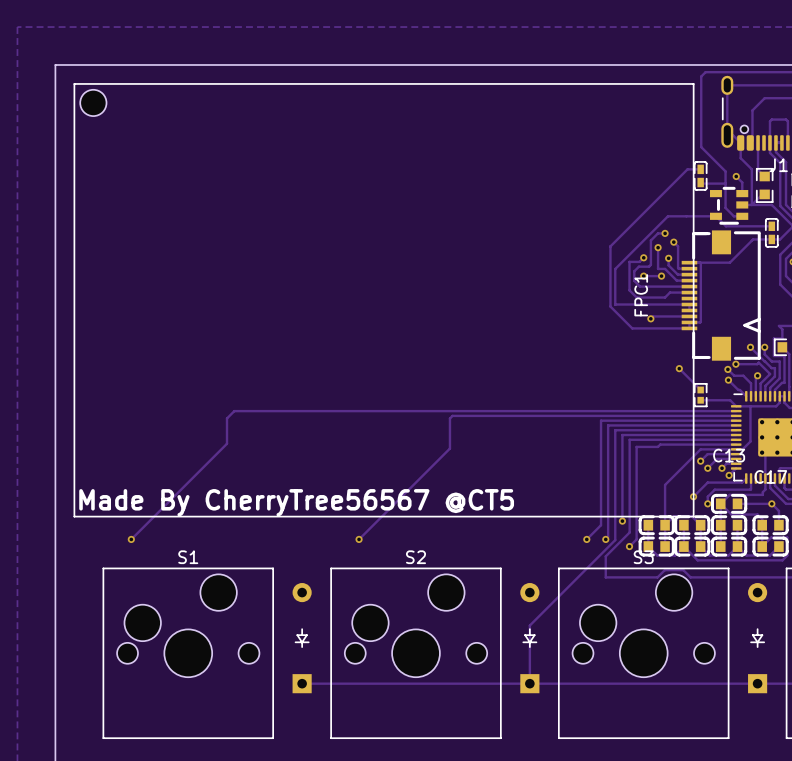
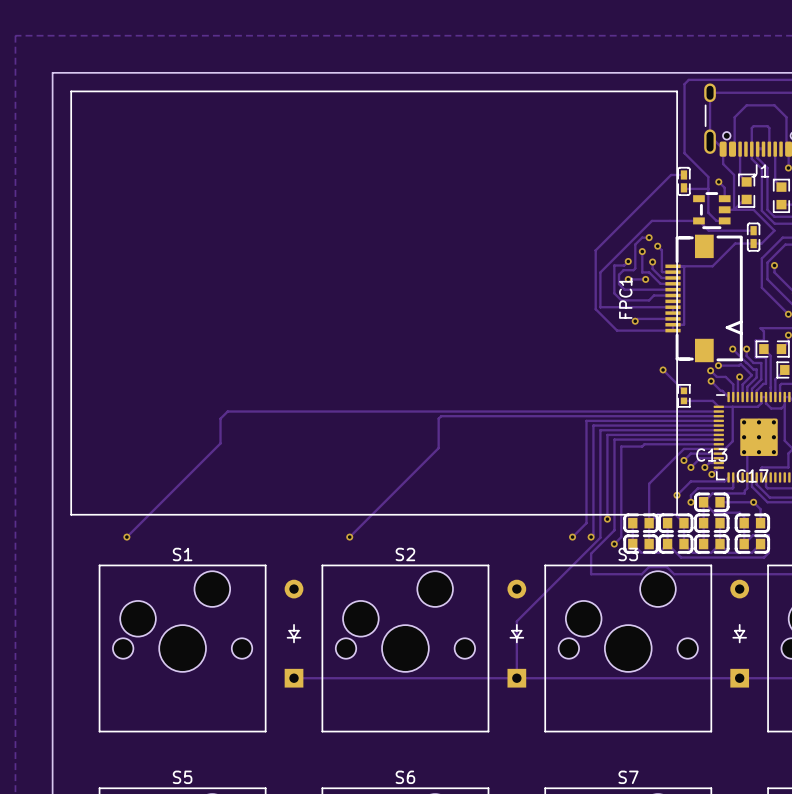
part: (93, 102) -> none
text: Made By CherryTree56567 @CT5 (296, 502) -> none

